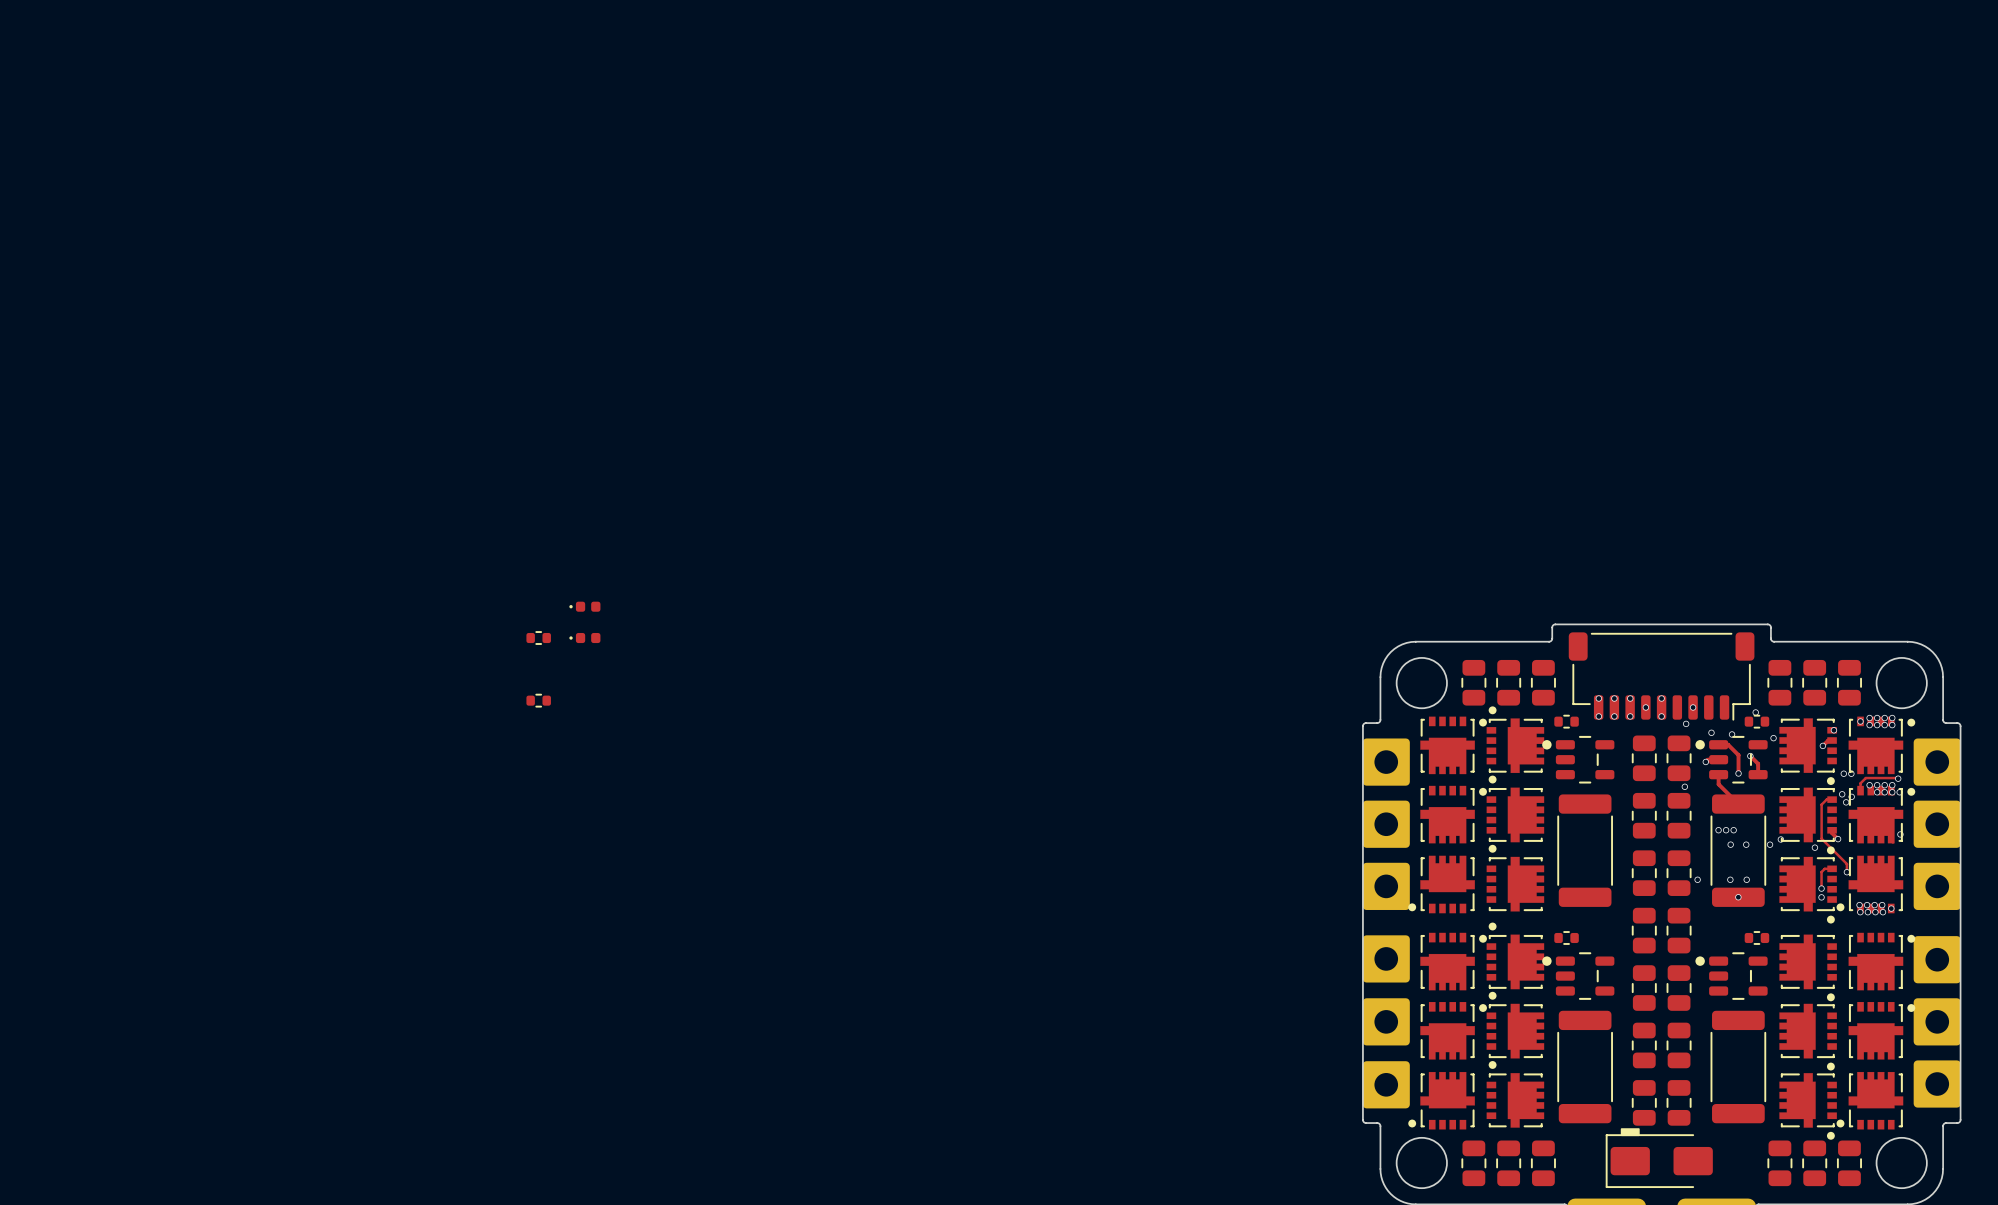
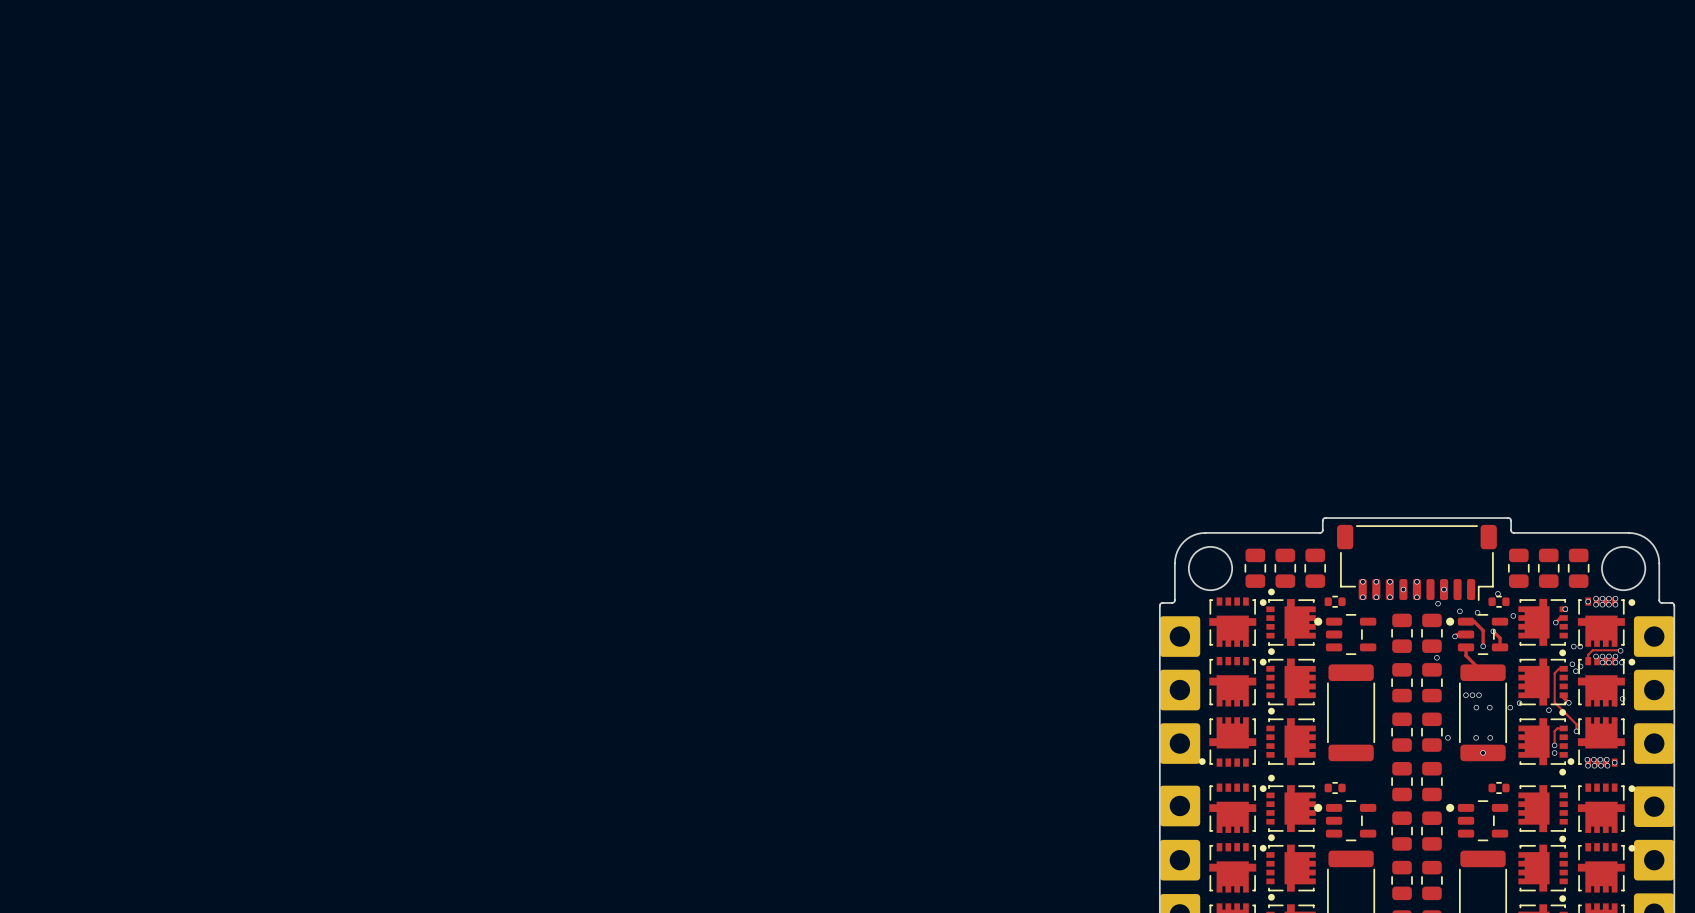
part: (584, 606) -> none
part: (538, 638) -> none
part: (584, 638) -> none
part: (538, 700) -> none

